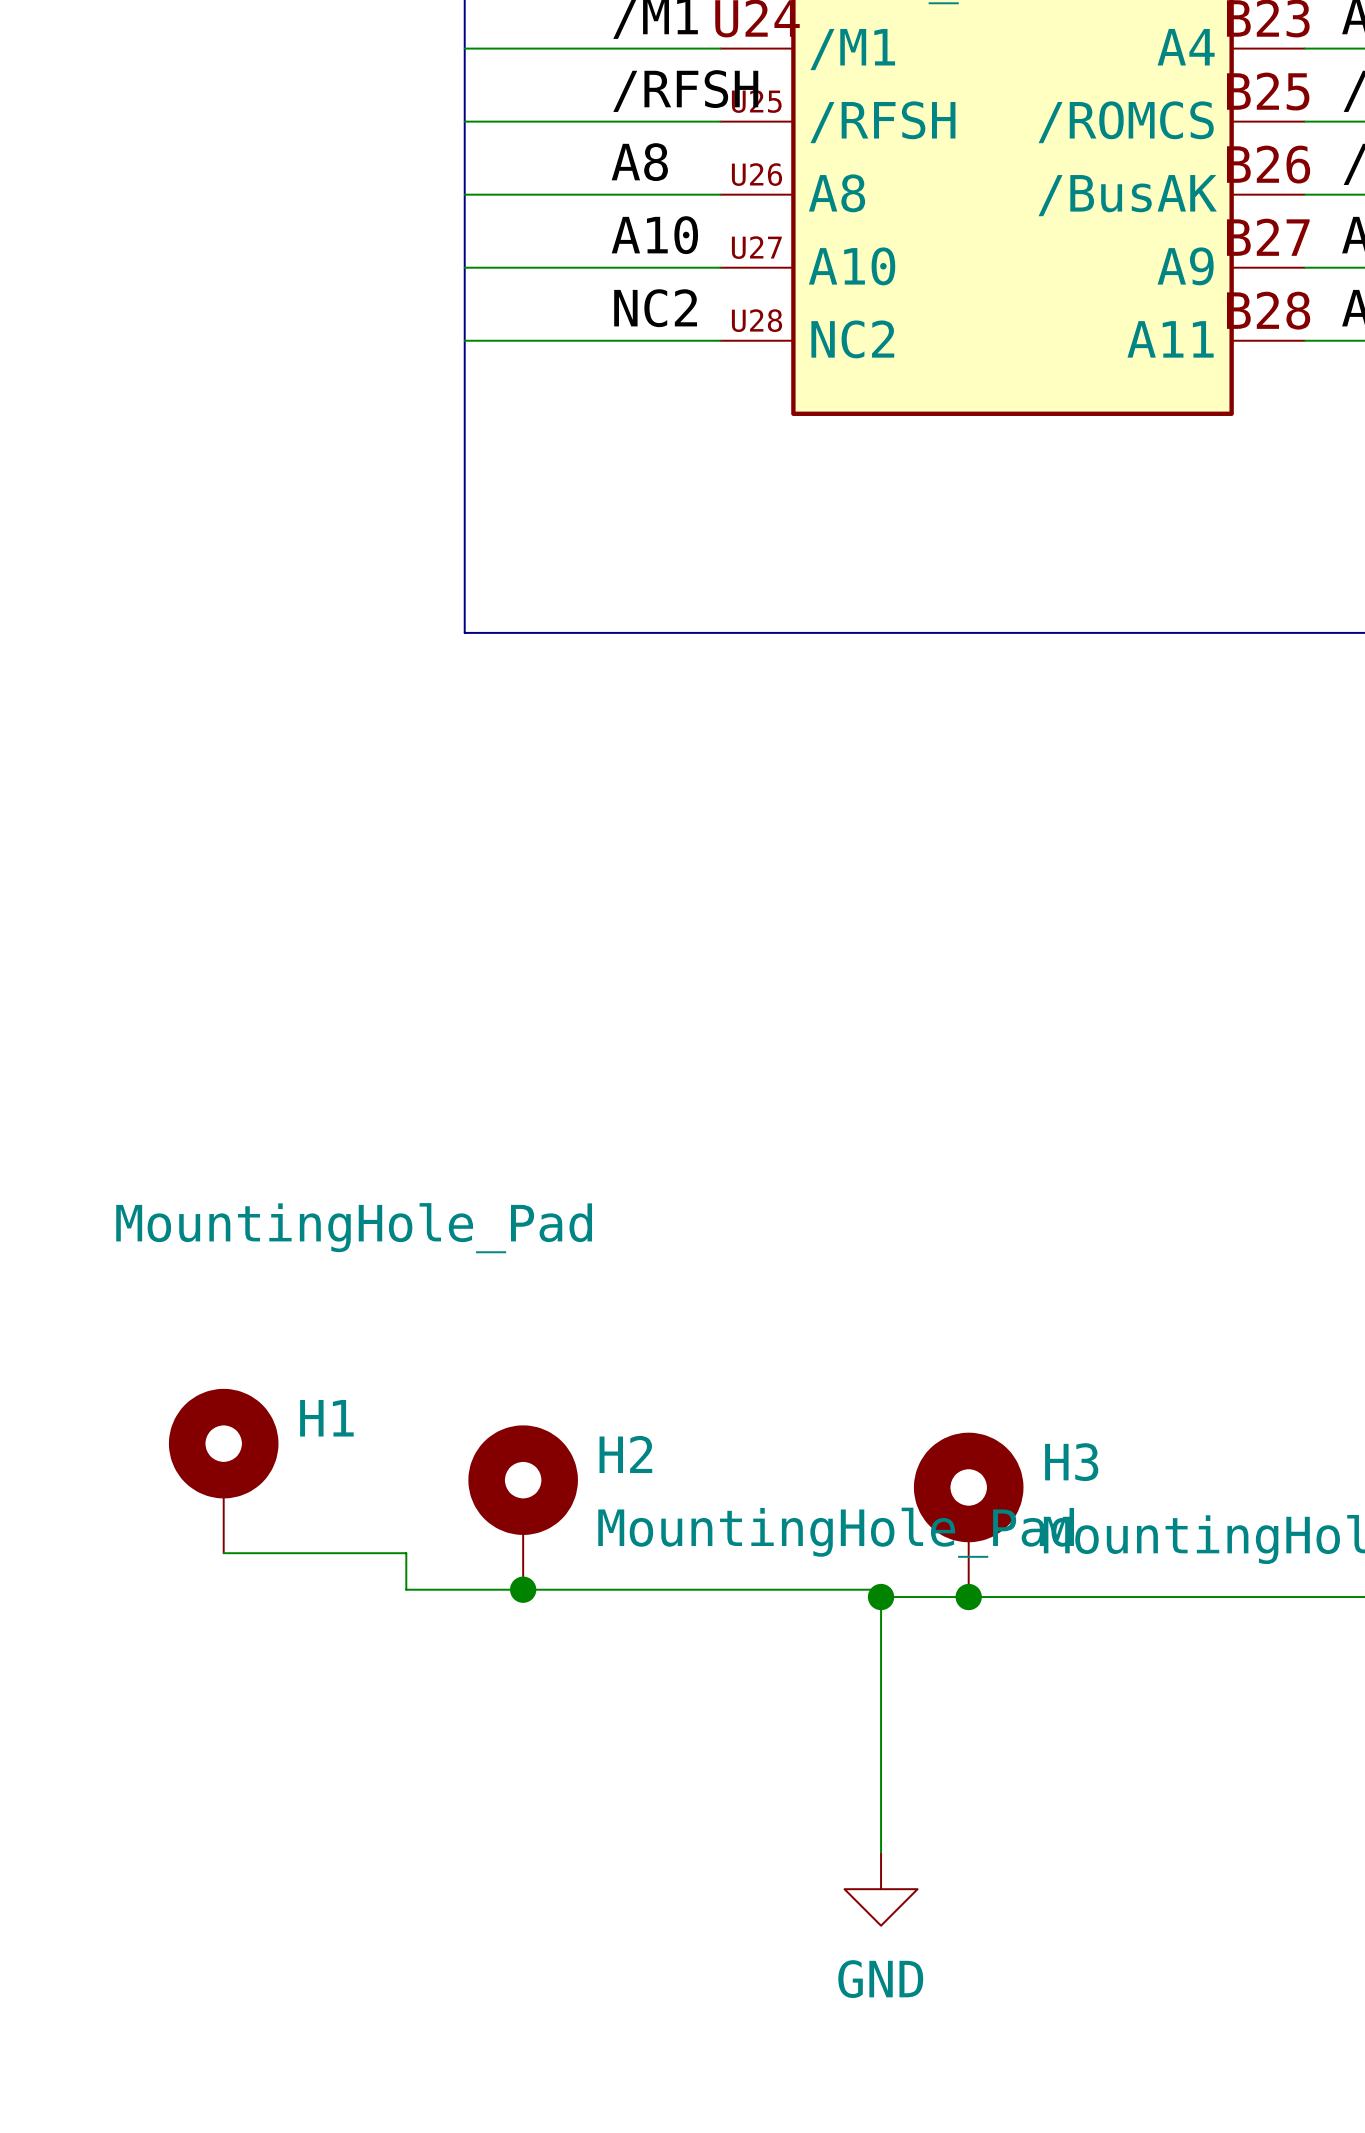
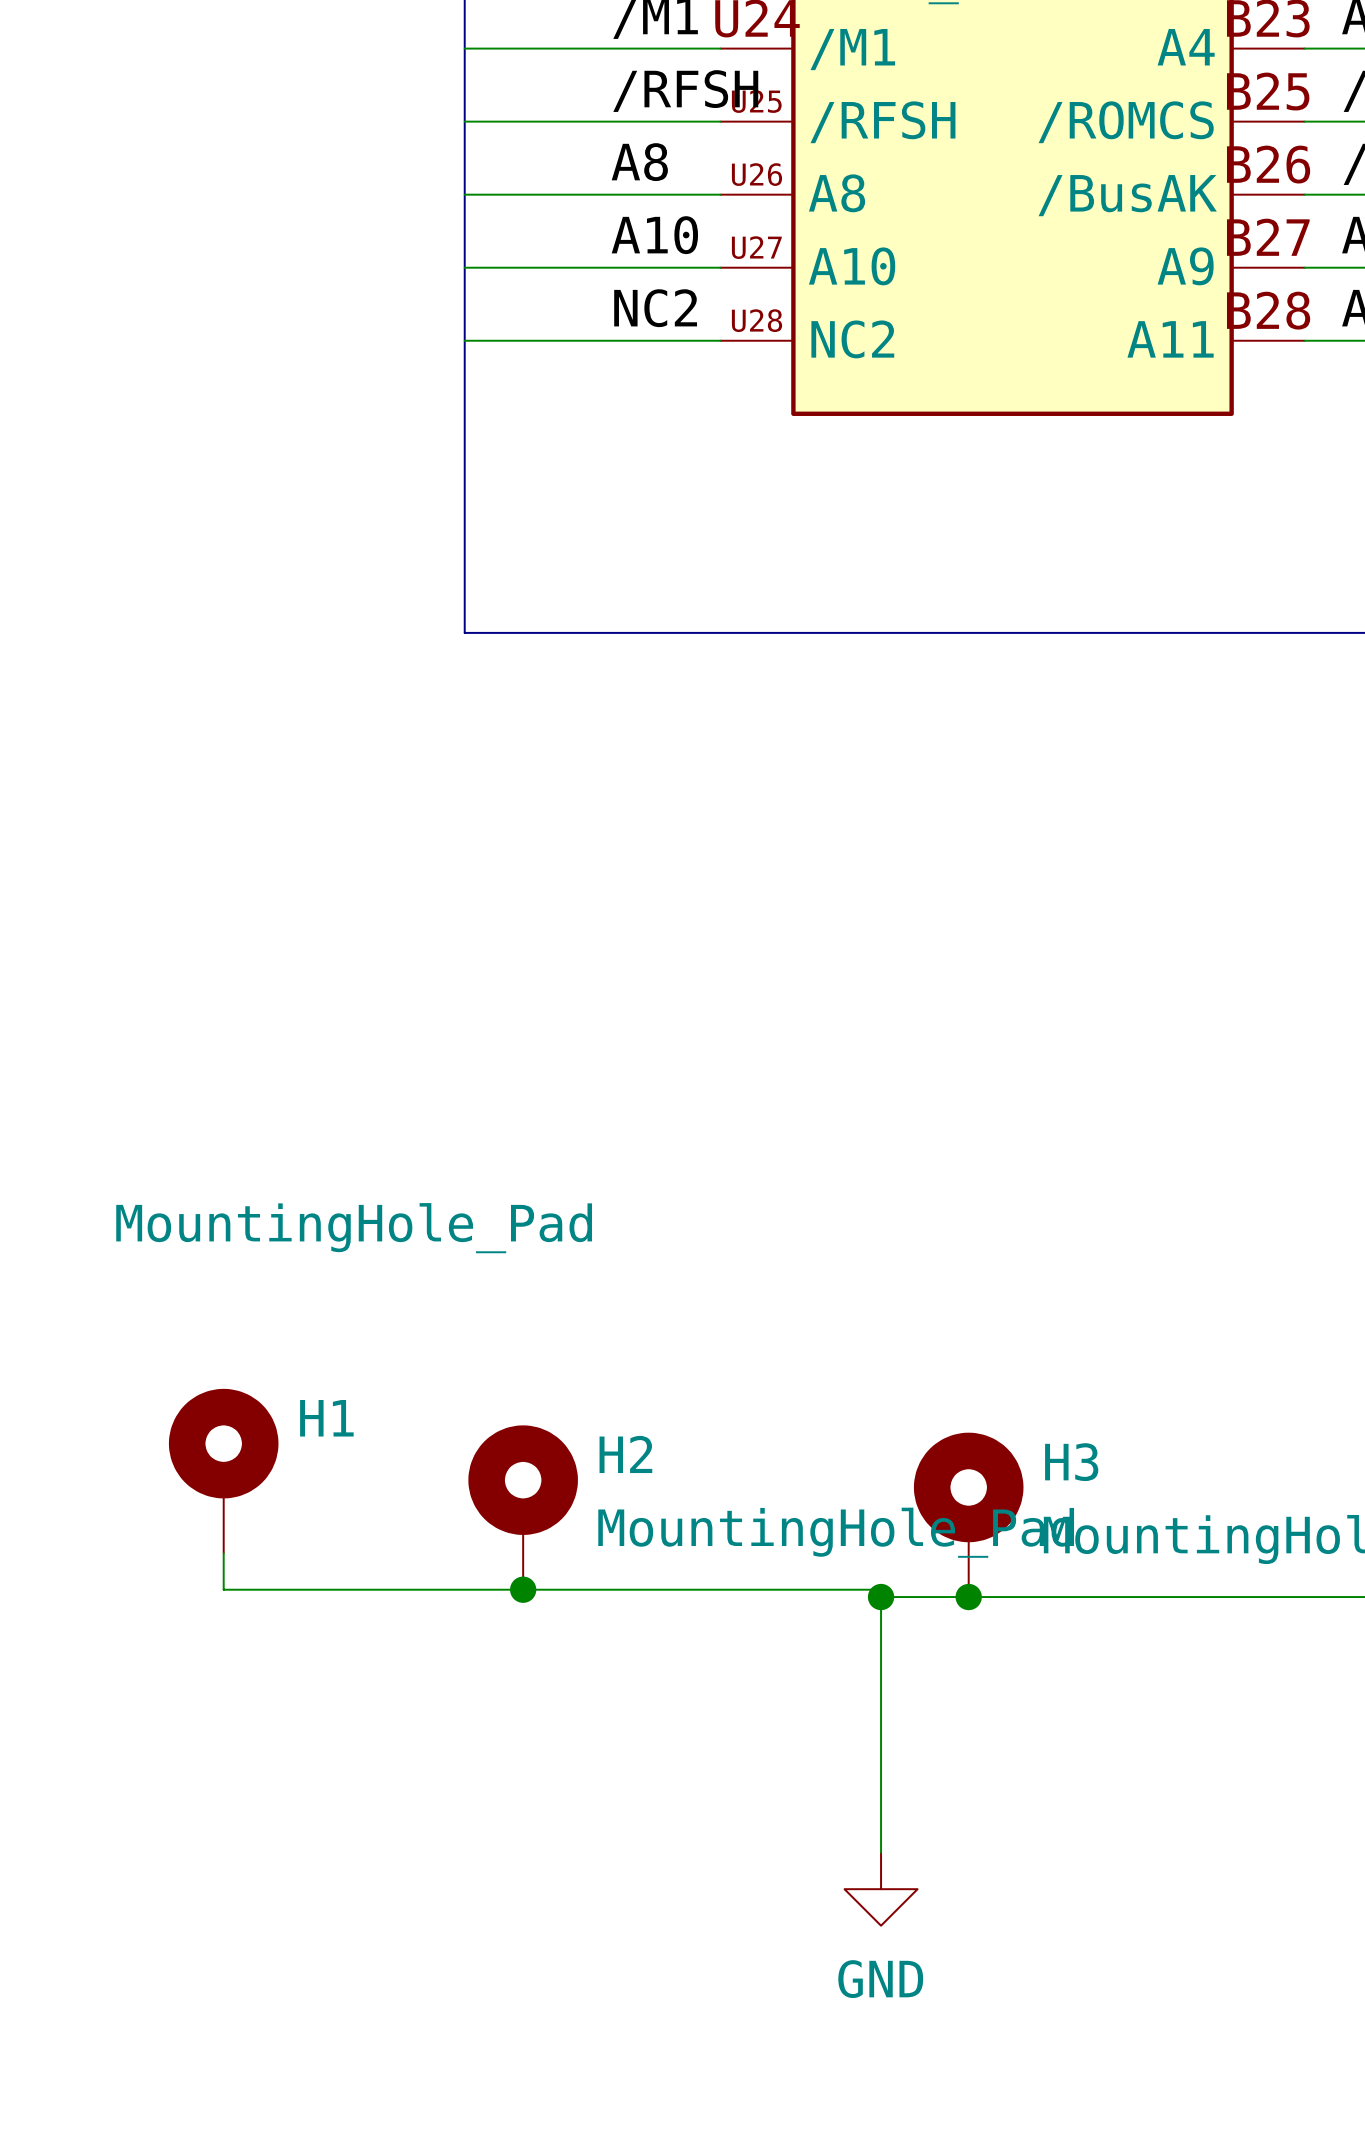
wire: (223, 1553) (406, 1553) (406, 1589) -> (223, 1553) (223, 1589) (406, 1589)

